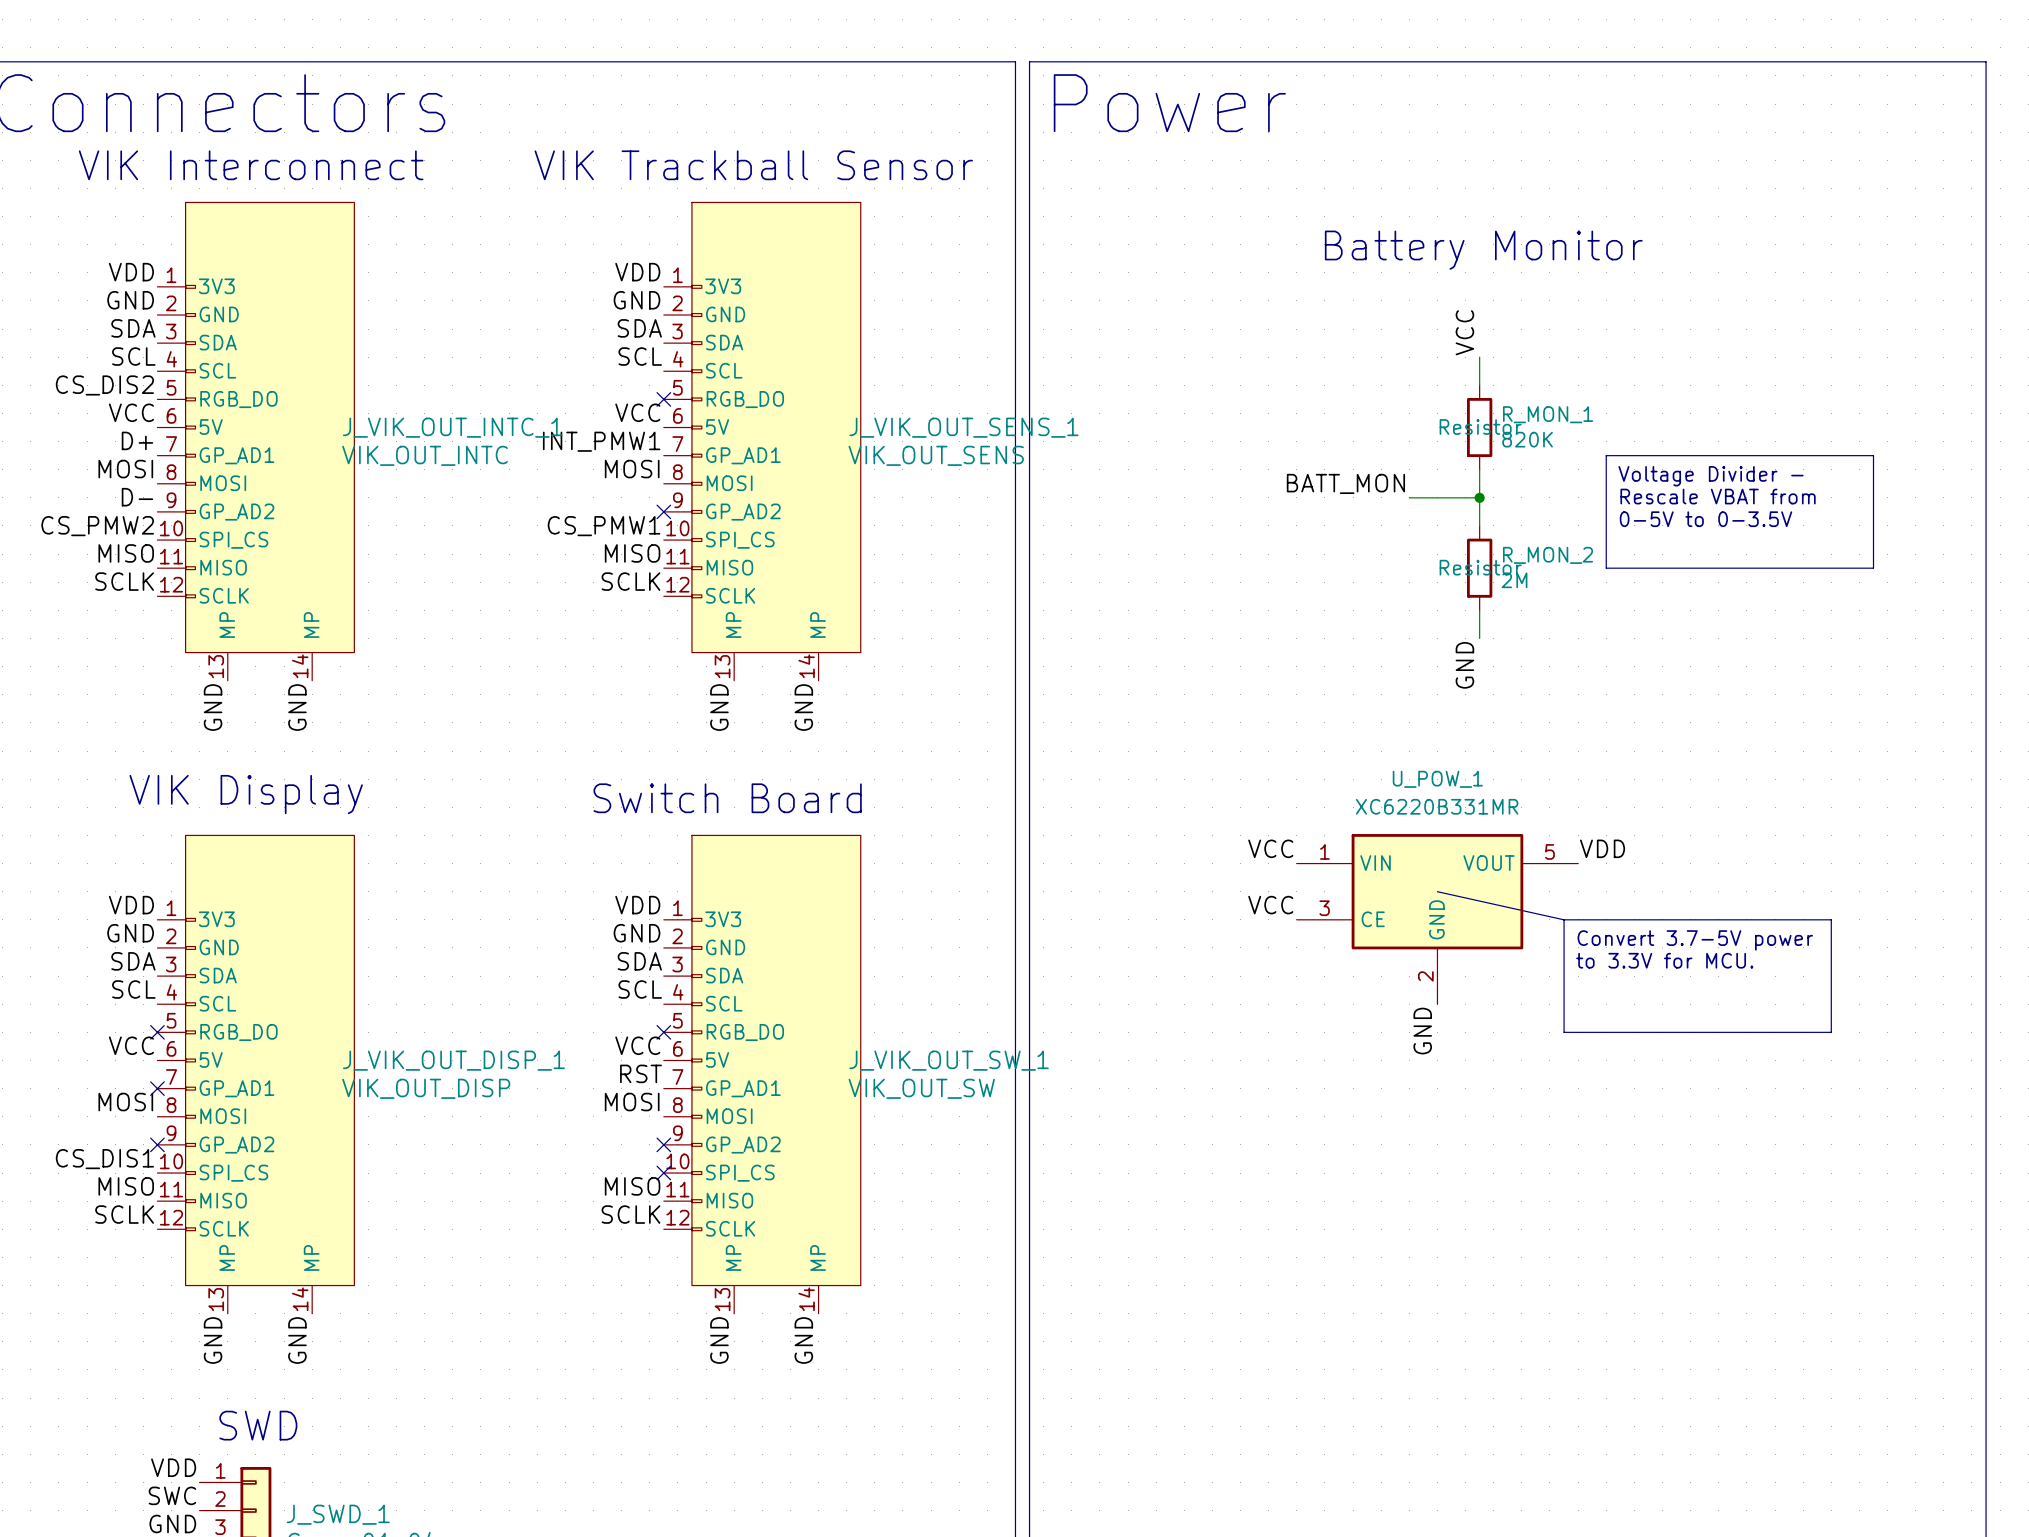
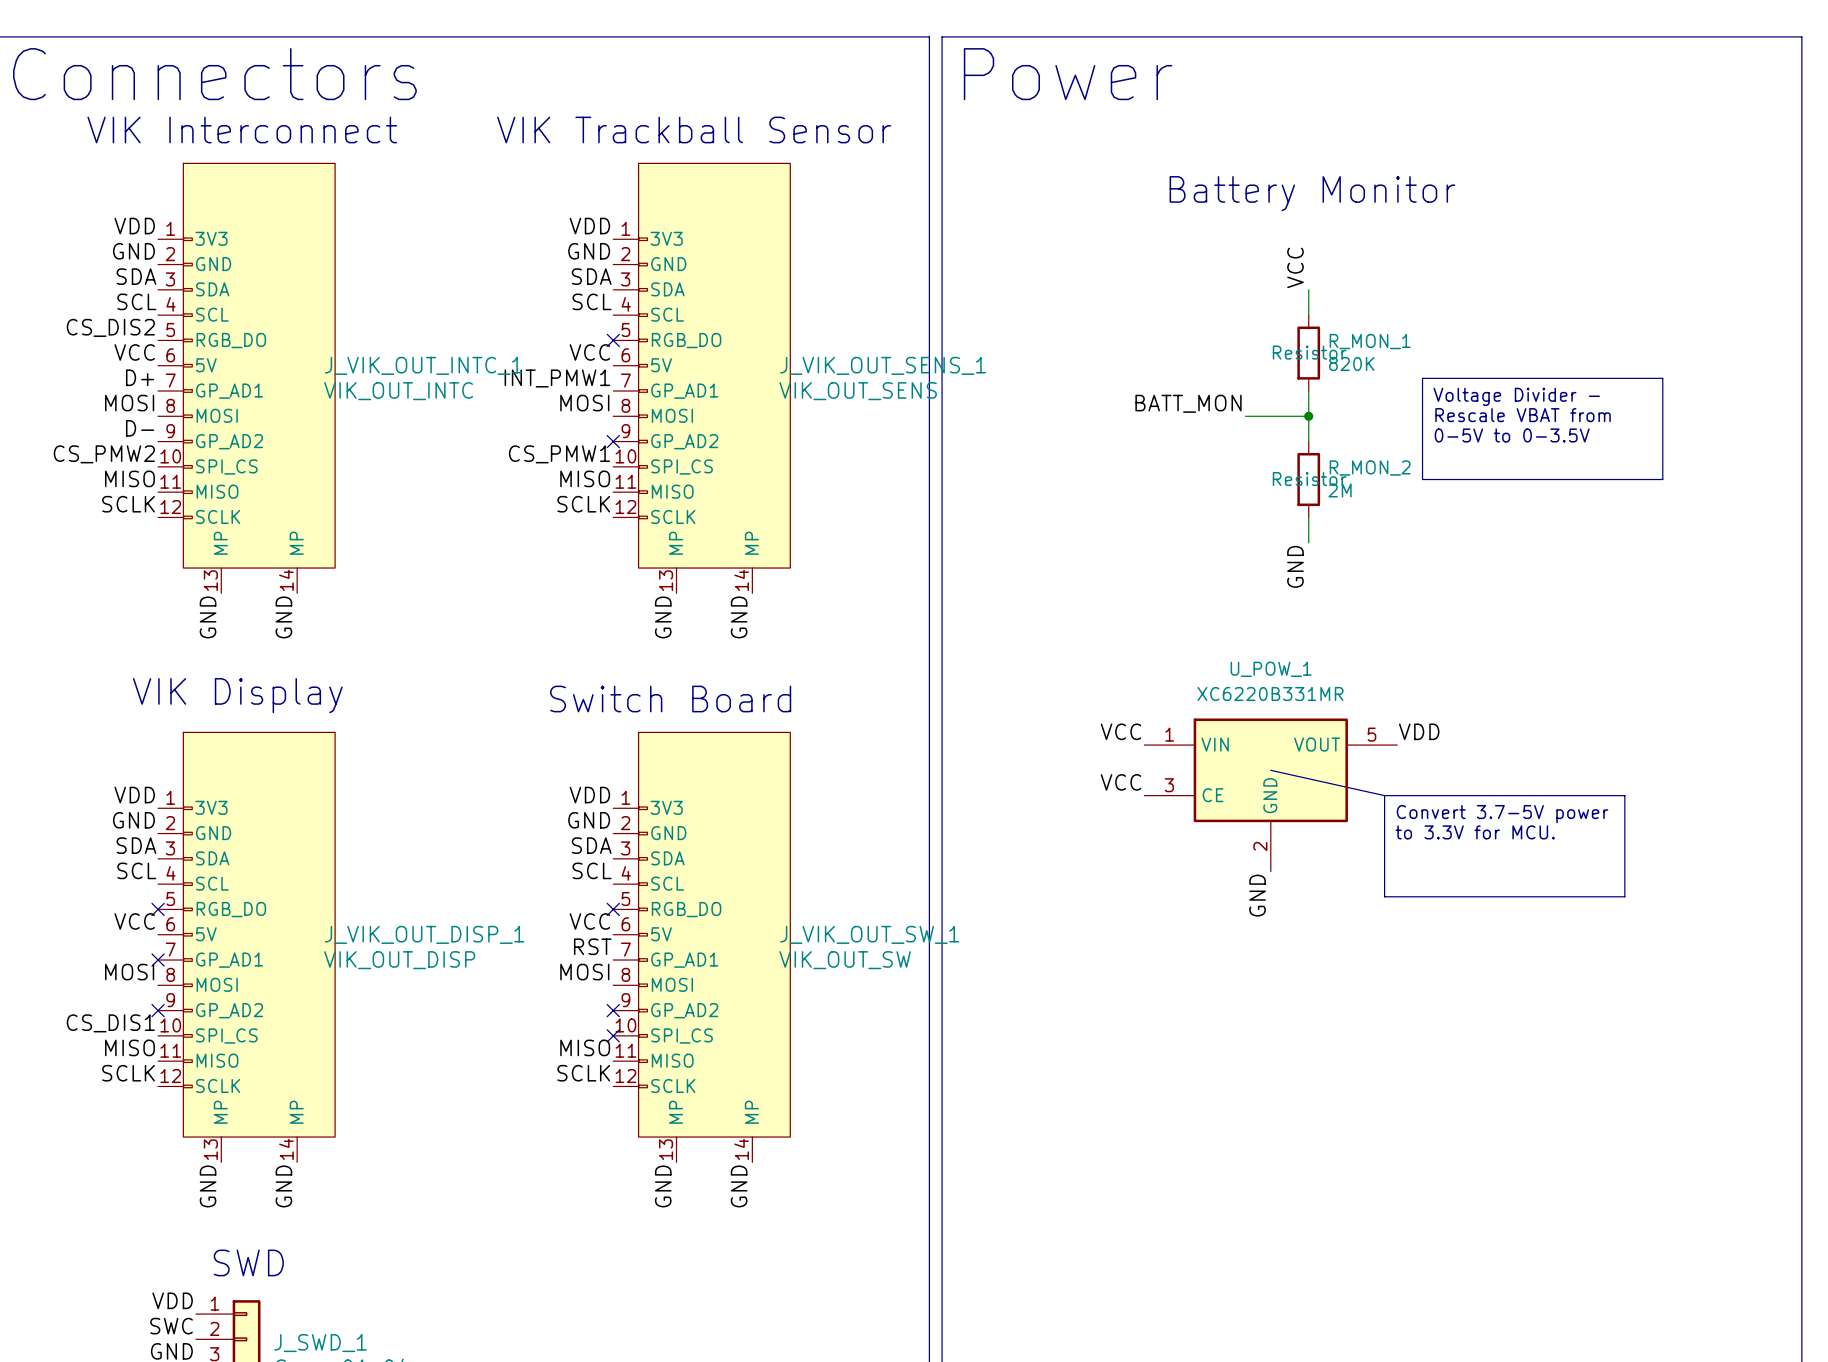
text position: Battery Monitor (1483, 250) -> Battery Monitor (1312, 193)
label position: VCC (1464, 332) -> VCC (1295, 267)
wire: (1479, 357) (1479, 385) -> (1308, 289) (1308, 315)
R_MON_1 position: (1479, 427) -> (1308, 353)
line: (1606, 455) (1873, 455) (1873, 568) (1606, 568) (1606, 455) -> (1422, 378) (1662, 378) (1662, 479) (1422, 479) (1422, 378)
wire: (1479, 469) (1479, 525) -> (1308, 391) (1308, 441)
text position: Voltage Divider - (1711, 476) -> Voltage Divider - (1516, 396)
label position: BATT_MON (1345, 483) -> BATT_MON (1188, 403)
text position: Rescale VBAT from (1718, 496) -> Rescale VBAT from (1523, 415)
wire: (1409, 497) (1479, 497) -> (1245, 416) (1308, 416)
junction position: (1479, 497) -> (1308, 416)
text position: 0-5V to 0-3.5V (1705, 519) -> 0-5V to 0-3.5V (1512, 435)
R_MON_2 position: (1479, 568) -> (1308, 479)
wire: (1479, 610) (1479, 638) -> (1308, 517) (1308, 542)
label position: GND (1464, 665) -> GND (1295, 566)
label position: VCC (1270, 848) -> VCC (1120, 731)
label position: VDD (1602, 848) -> VDD (1419, 731)
line: (1437, 891) (1564, 919) -> (1270, 770) (1384, 795)
label position: VCC (1270, 905) -> VCC (1120, 782)
U_POW_1 position: (1437, 919) -> (1270, 795)
line: (1564, 919) (1831, 919) (1831, 1032) (1564, 1032) (1564, 919) -> (1384, 795) (1624, 795) (1624, 896) (1384, 896) (1384, 795)
text position: Convert 3.7-5V power (1695, 940) -> Convert 3.7-5V power (1502, 814)
text position: to 3.3V for MCU. (1664, 960) -> to 3.3V for MCU. (1475, 832)
label position: GND (1422, 1031) -> GND (1257, 895)

